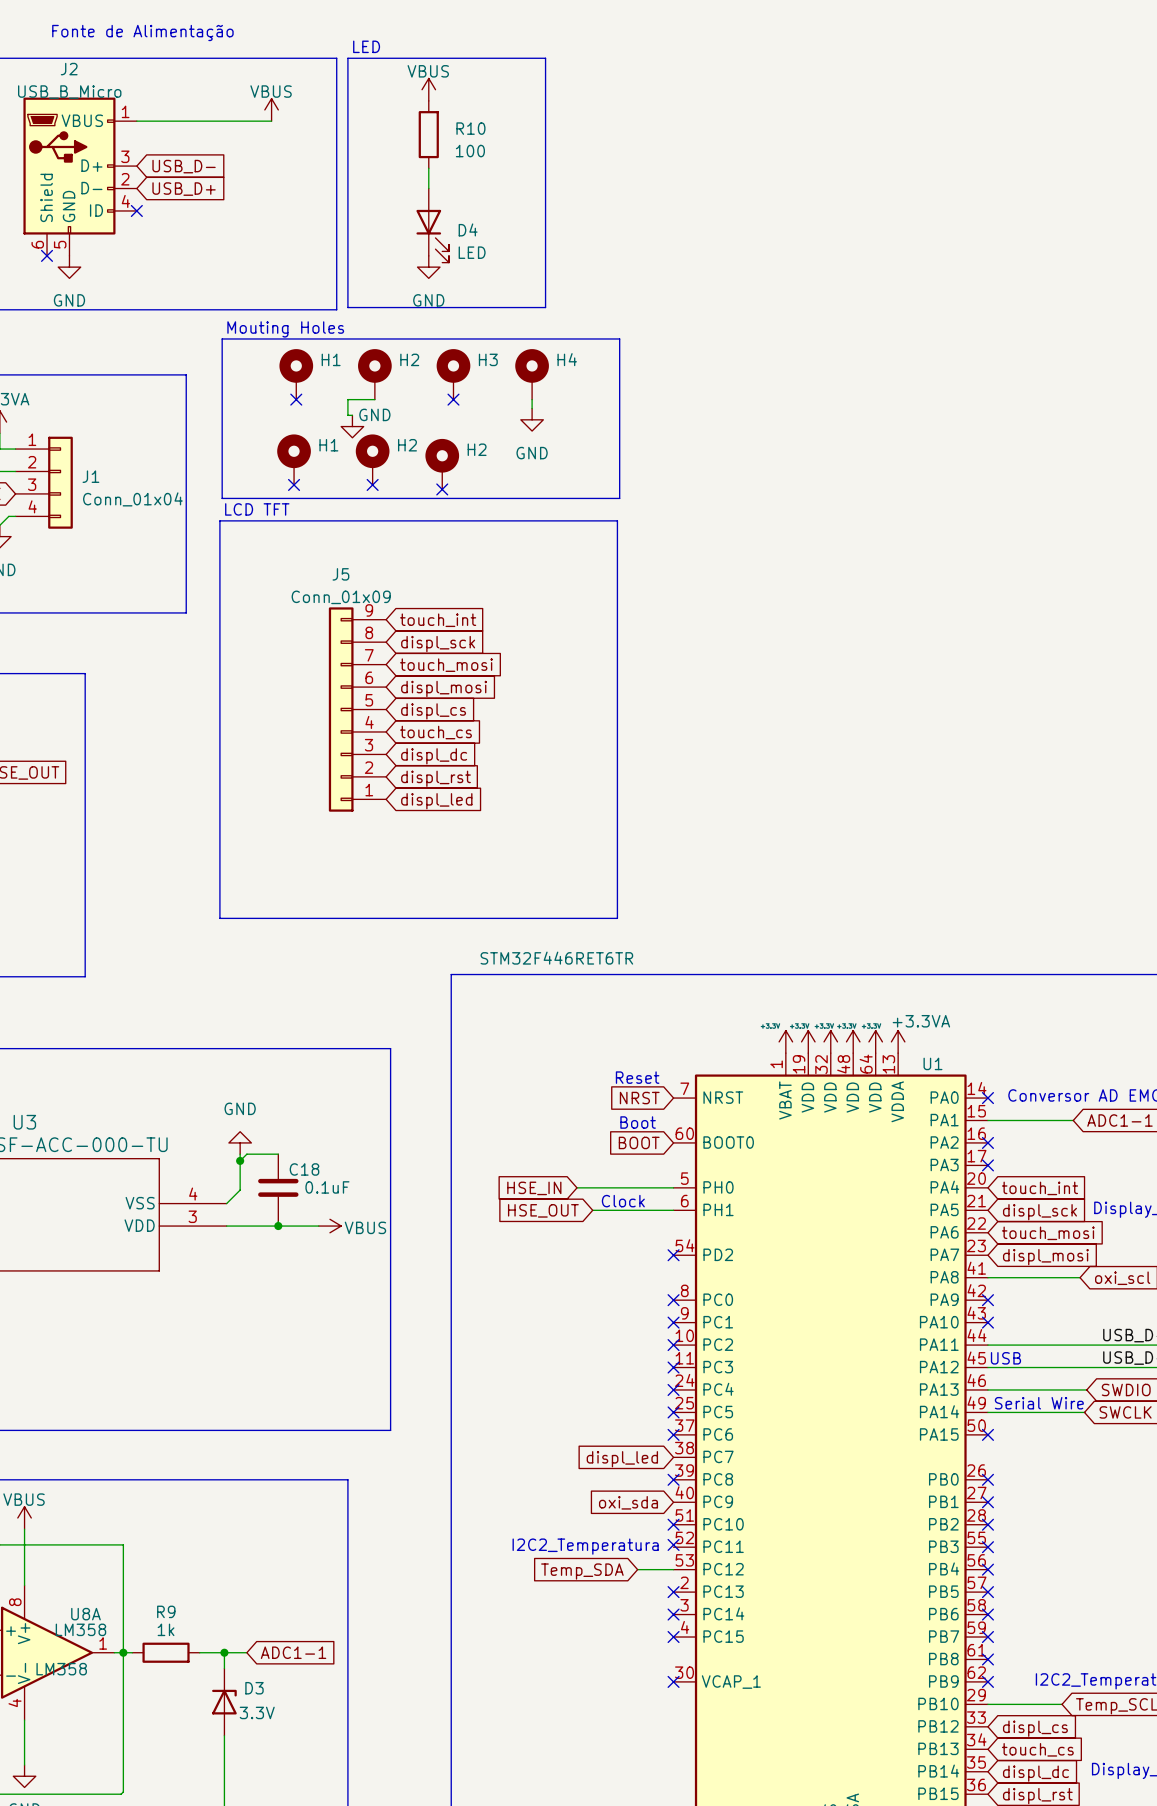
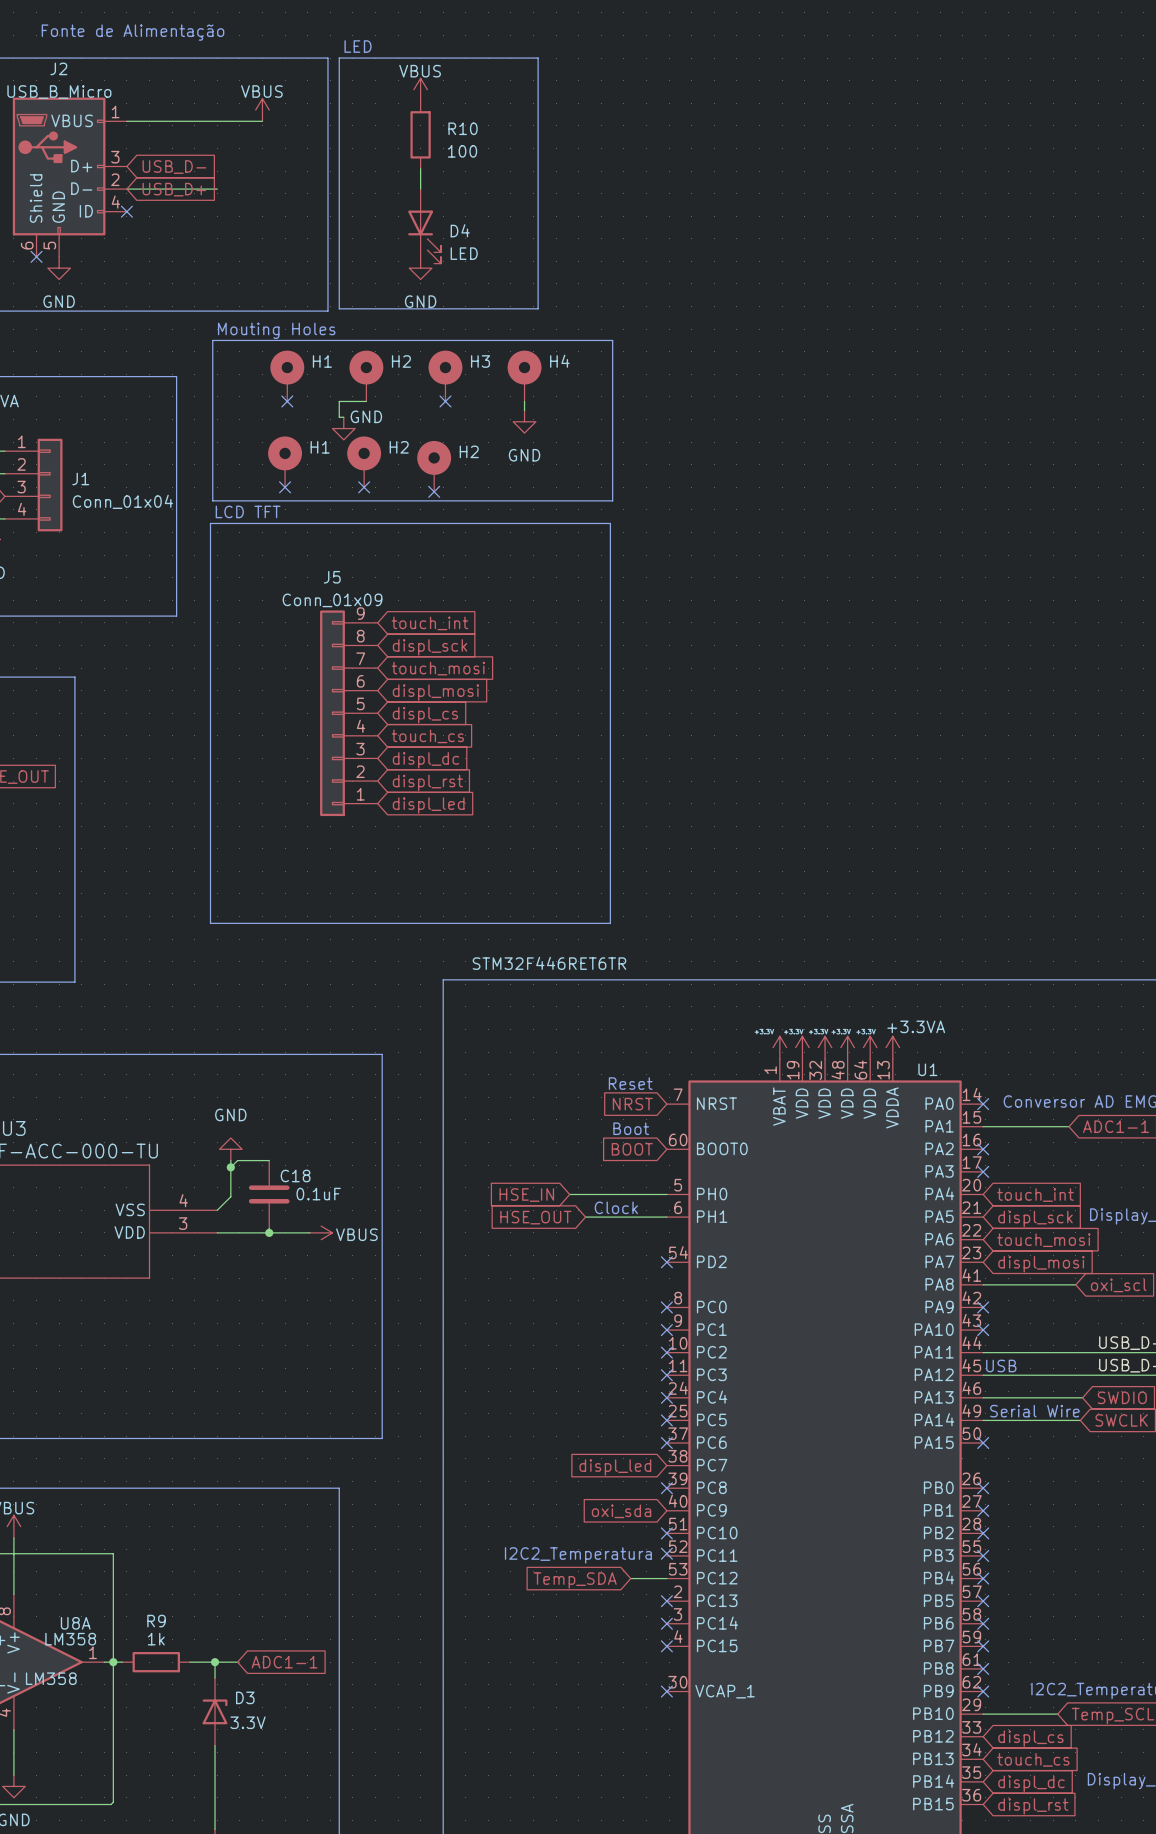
wire: none -> (126, 189) (217, 189)

